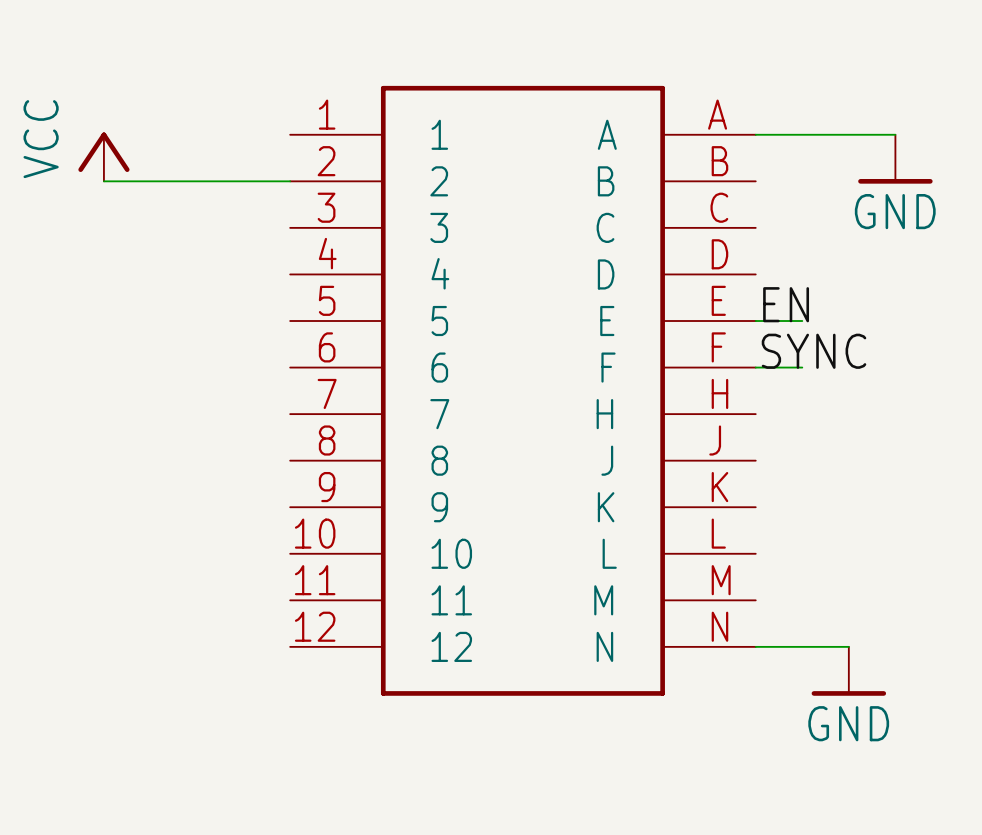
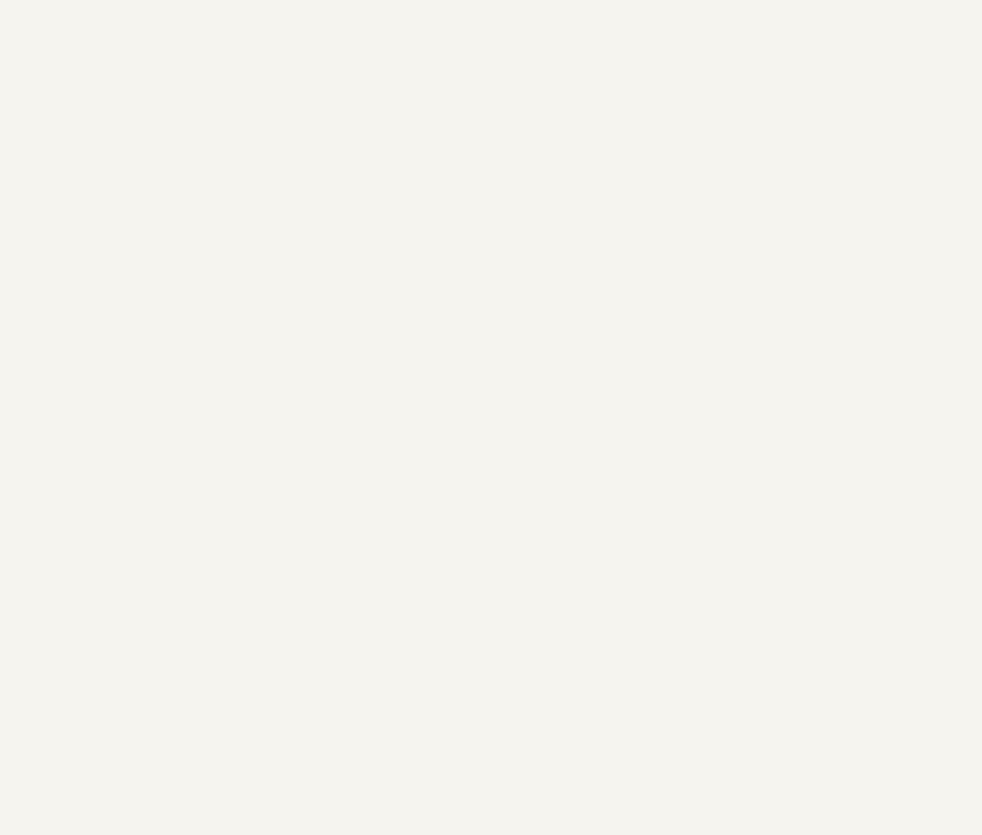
wire: (755, 134) (895, 134) -> none
power symbol: VCC (103, 156) -> none
power symbol: GND (895, 159) -> none
wire: (103, 181) (290, 181) -> none
label: EN (786, 304) -> none
wire: (755, 321) (802, 321) -> none
label: SYNC (814, 351) -> none
wire: (755, 367) (802, 367) -> none
part: (522, 390) -> none
wire: (755, 646) (848, 646) -> none
power symbol: GND (848, 671) -> none

